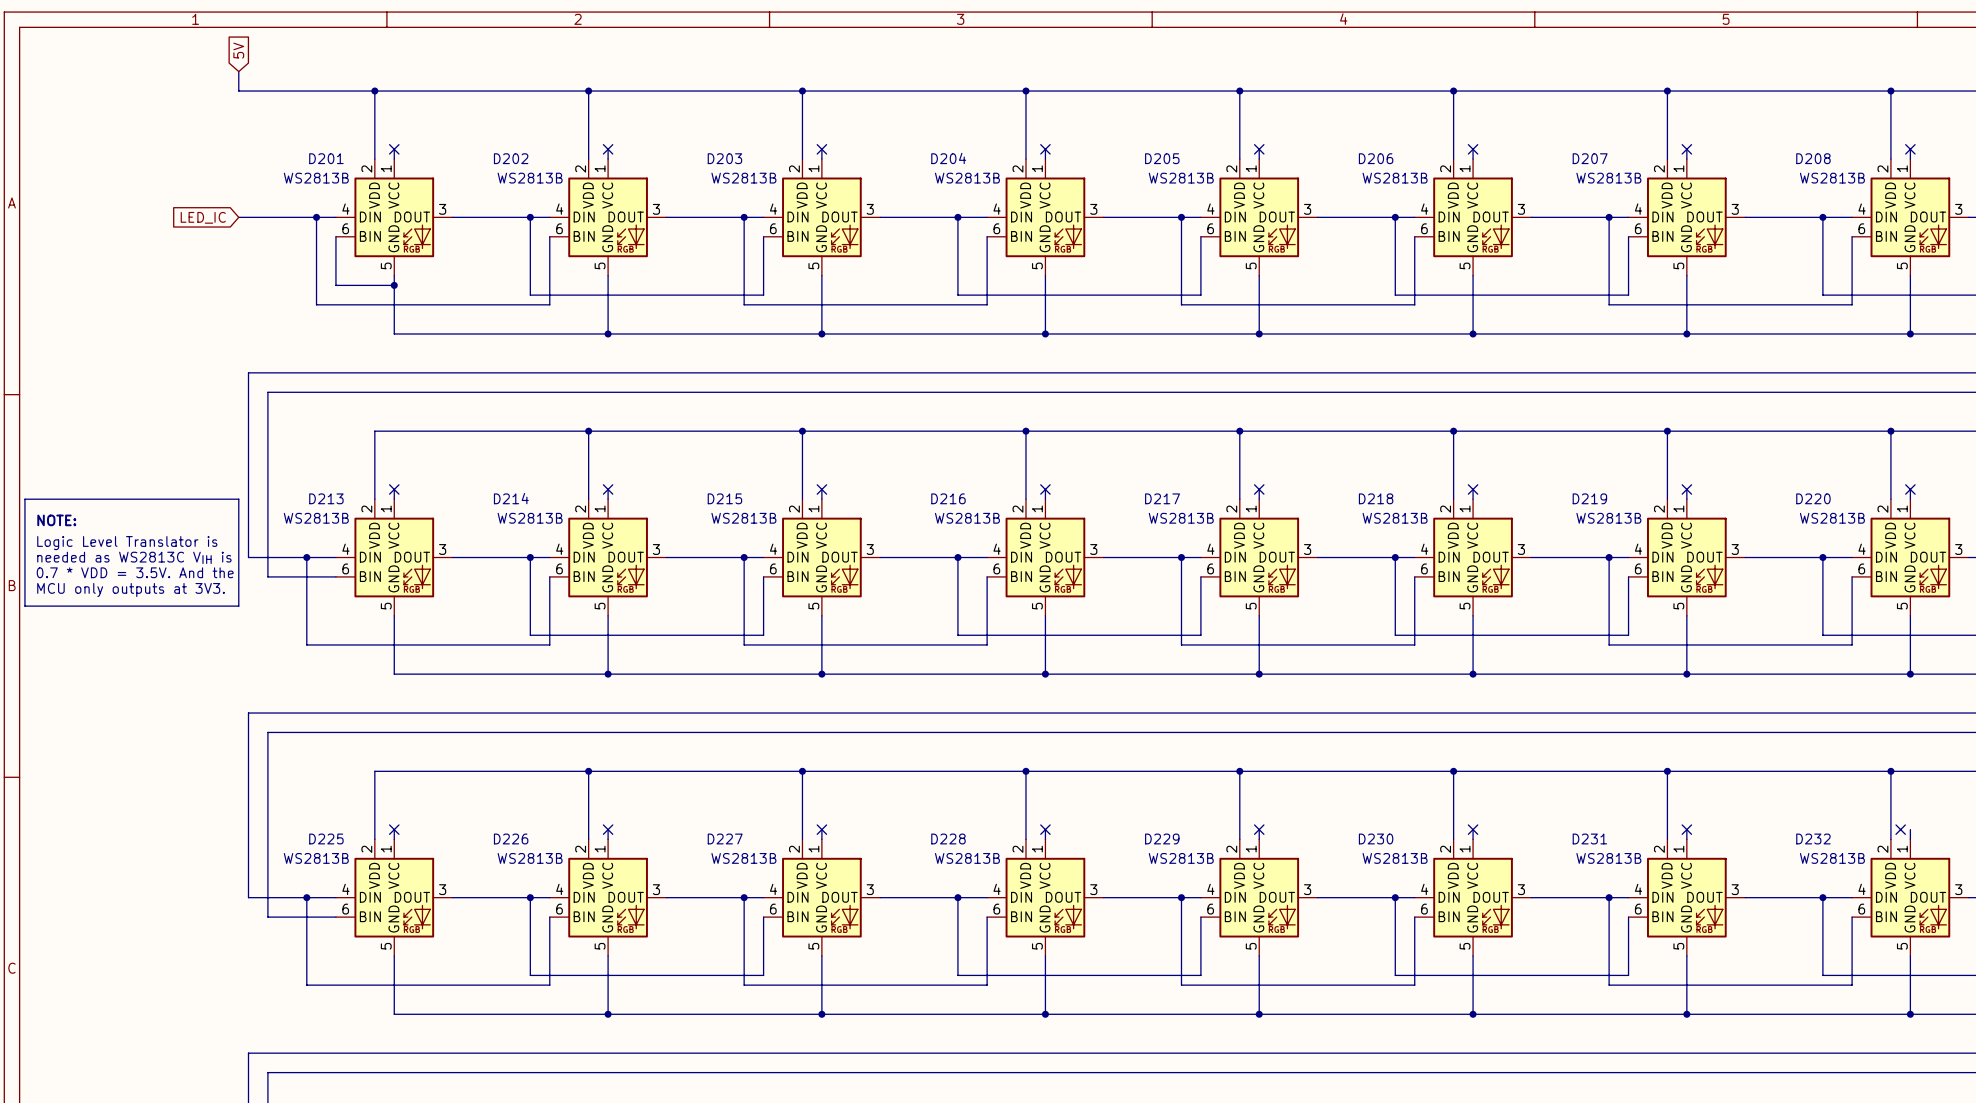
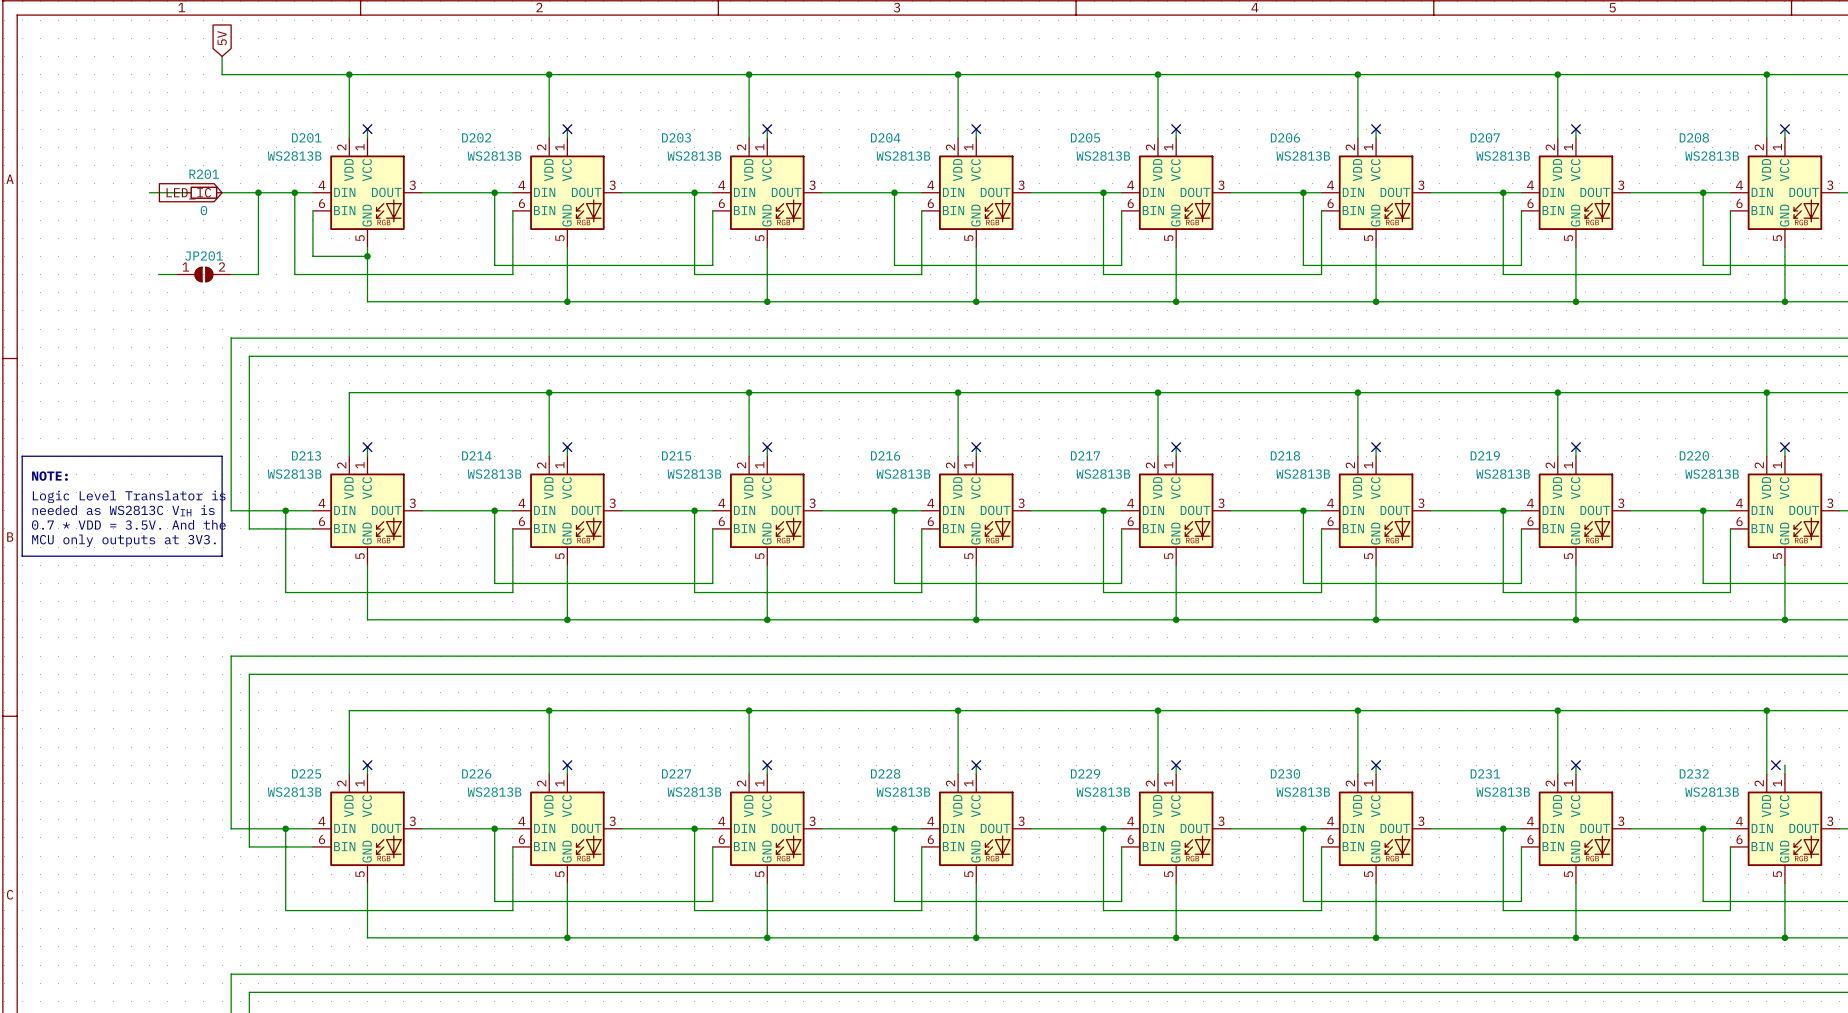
wire: none -> (149, 192) (185, 192)
R201: none -> 0 (203, 192)
wire: none -> (258, 192) (258, 274) (231, 274)
junction: none -> (258, 192)
wire: none -> (158, 274) (176, 274)
JP201: none -> (203, 274)

